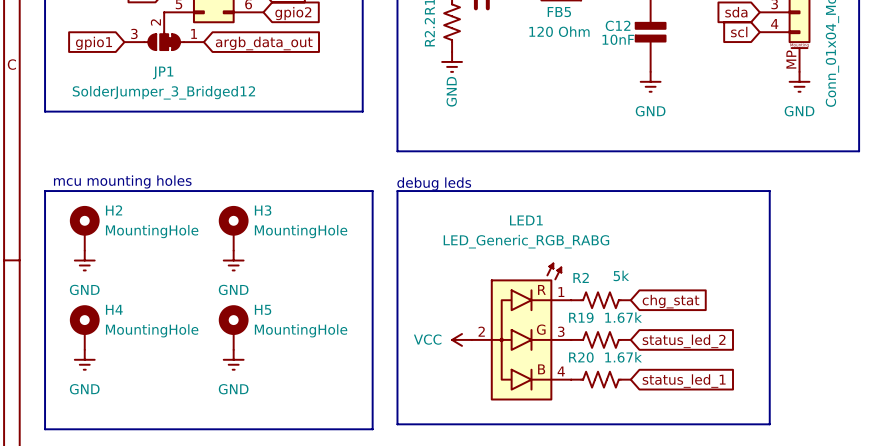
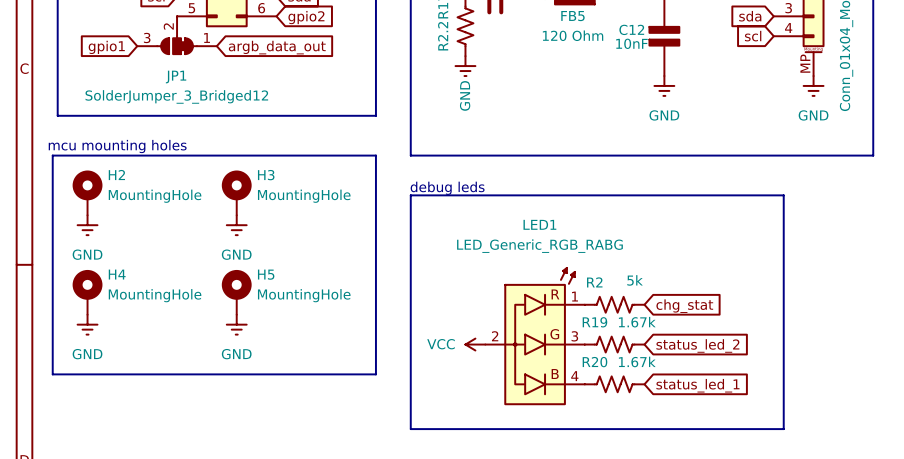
text position: mcu mounting holes (122, 181) -> mcu mounting holes (117, 146)
line: (45, 191) (45, 429) (372, 429) (372, 191) (45, 191) -> (52, 155) (52, 374) (375, 374) (375, 155) (52, 155)
power symbol: none -> GND (87, 225)
power symbol: none -> GND (236, 225)
H2 position: (84, 228) -> (87, 192)
H3 position: (233, 228) -> (236, 192)
power symbol: GND (84, 260) -> none
power symbol: GND (233, 260) -> none
power symbol: none -> GND (87, 324)
power symbol: none -> GND (236, 324)
H4 position: (84, 327) -> (87, 292)
H5 position: (233, 327) -> (236, 292)
power symbol: GND (84, 359) -> none
power symbol: GND (233, 359) -> none

